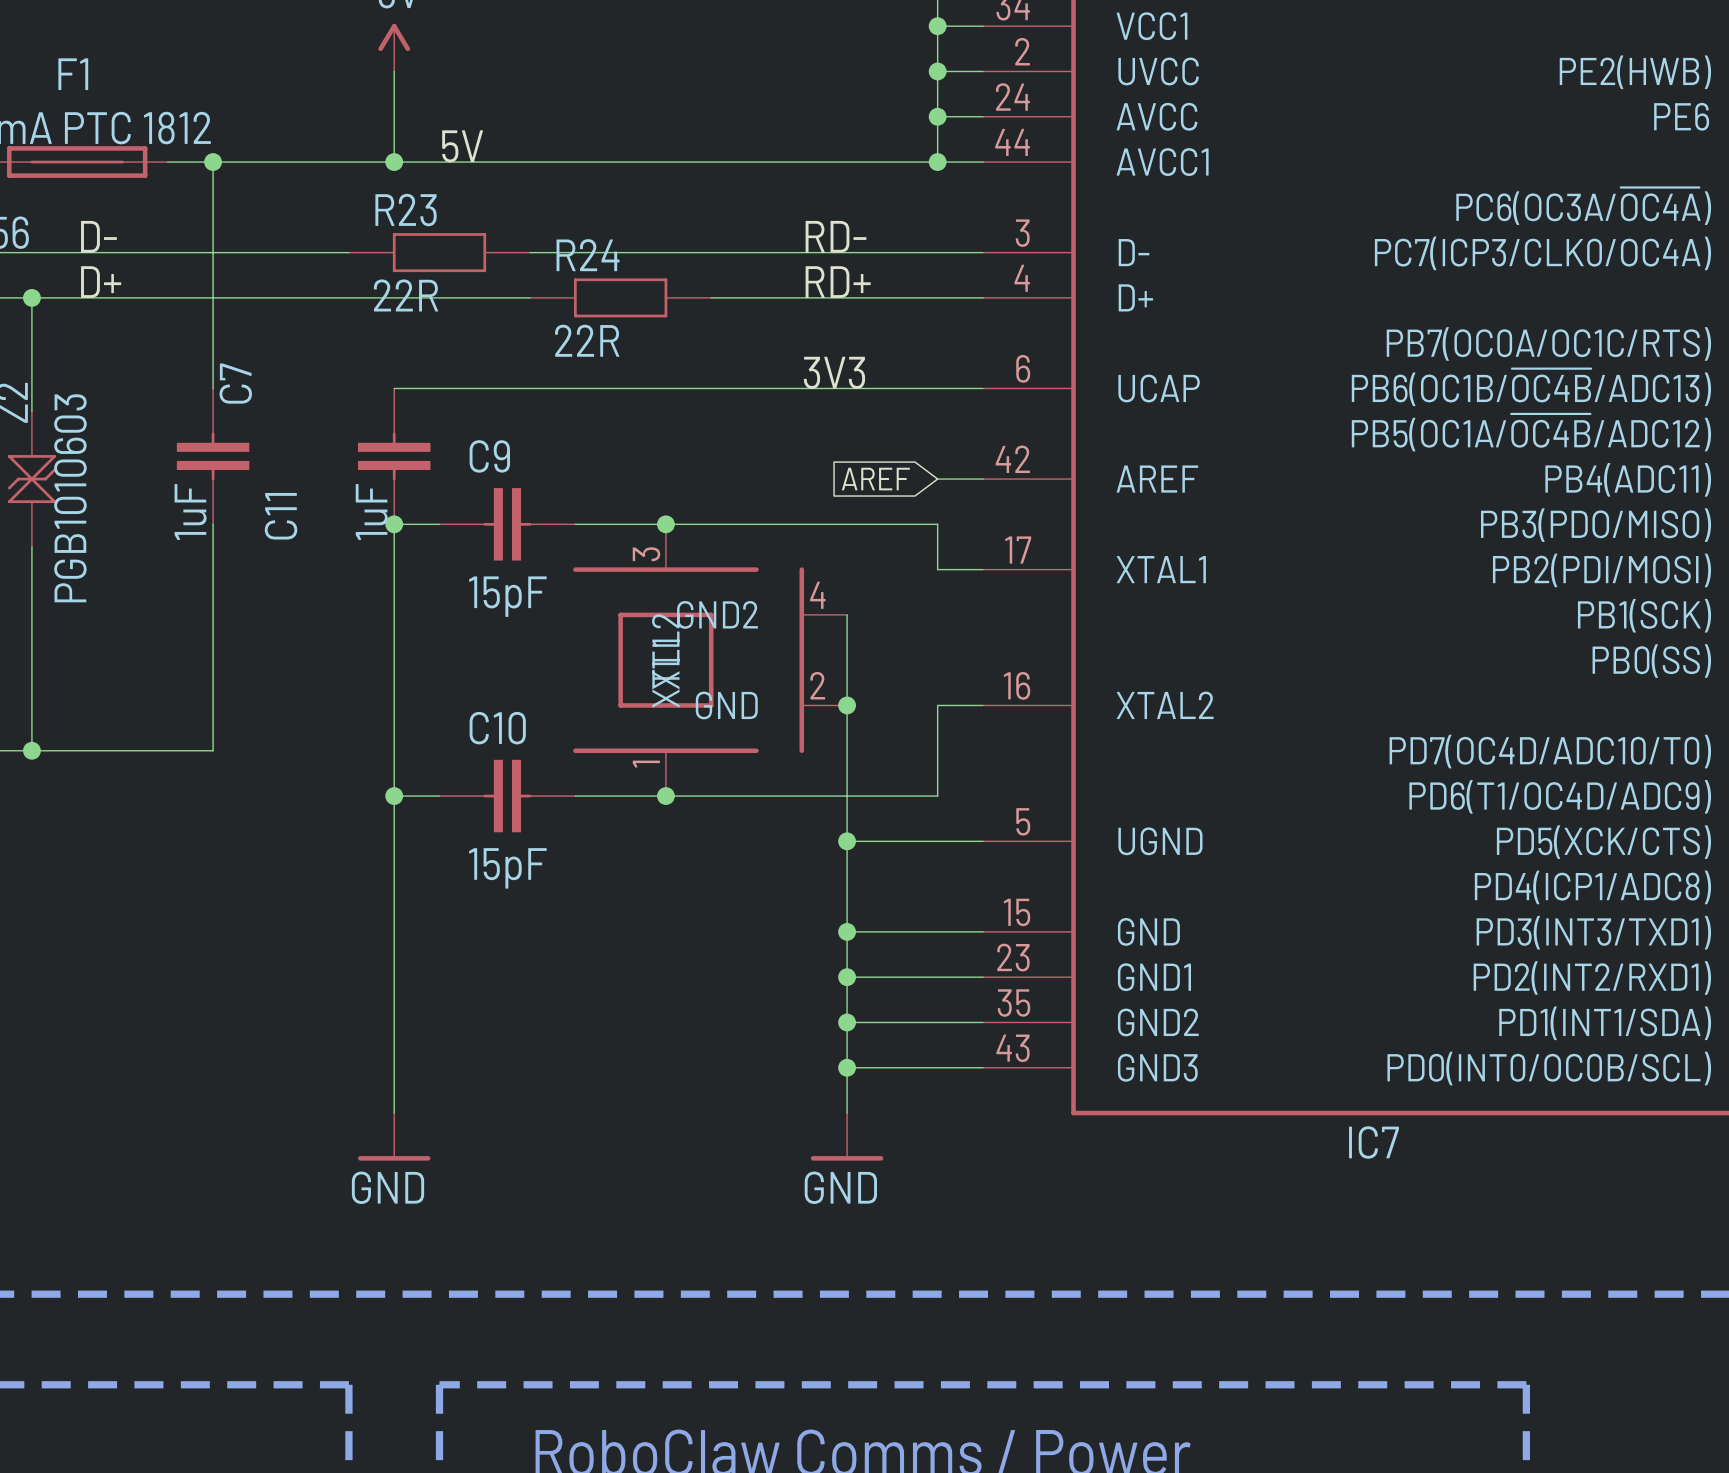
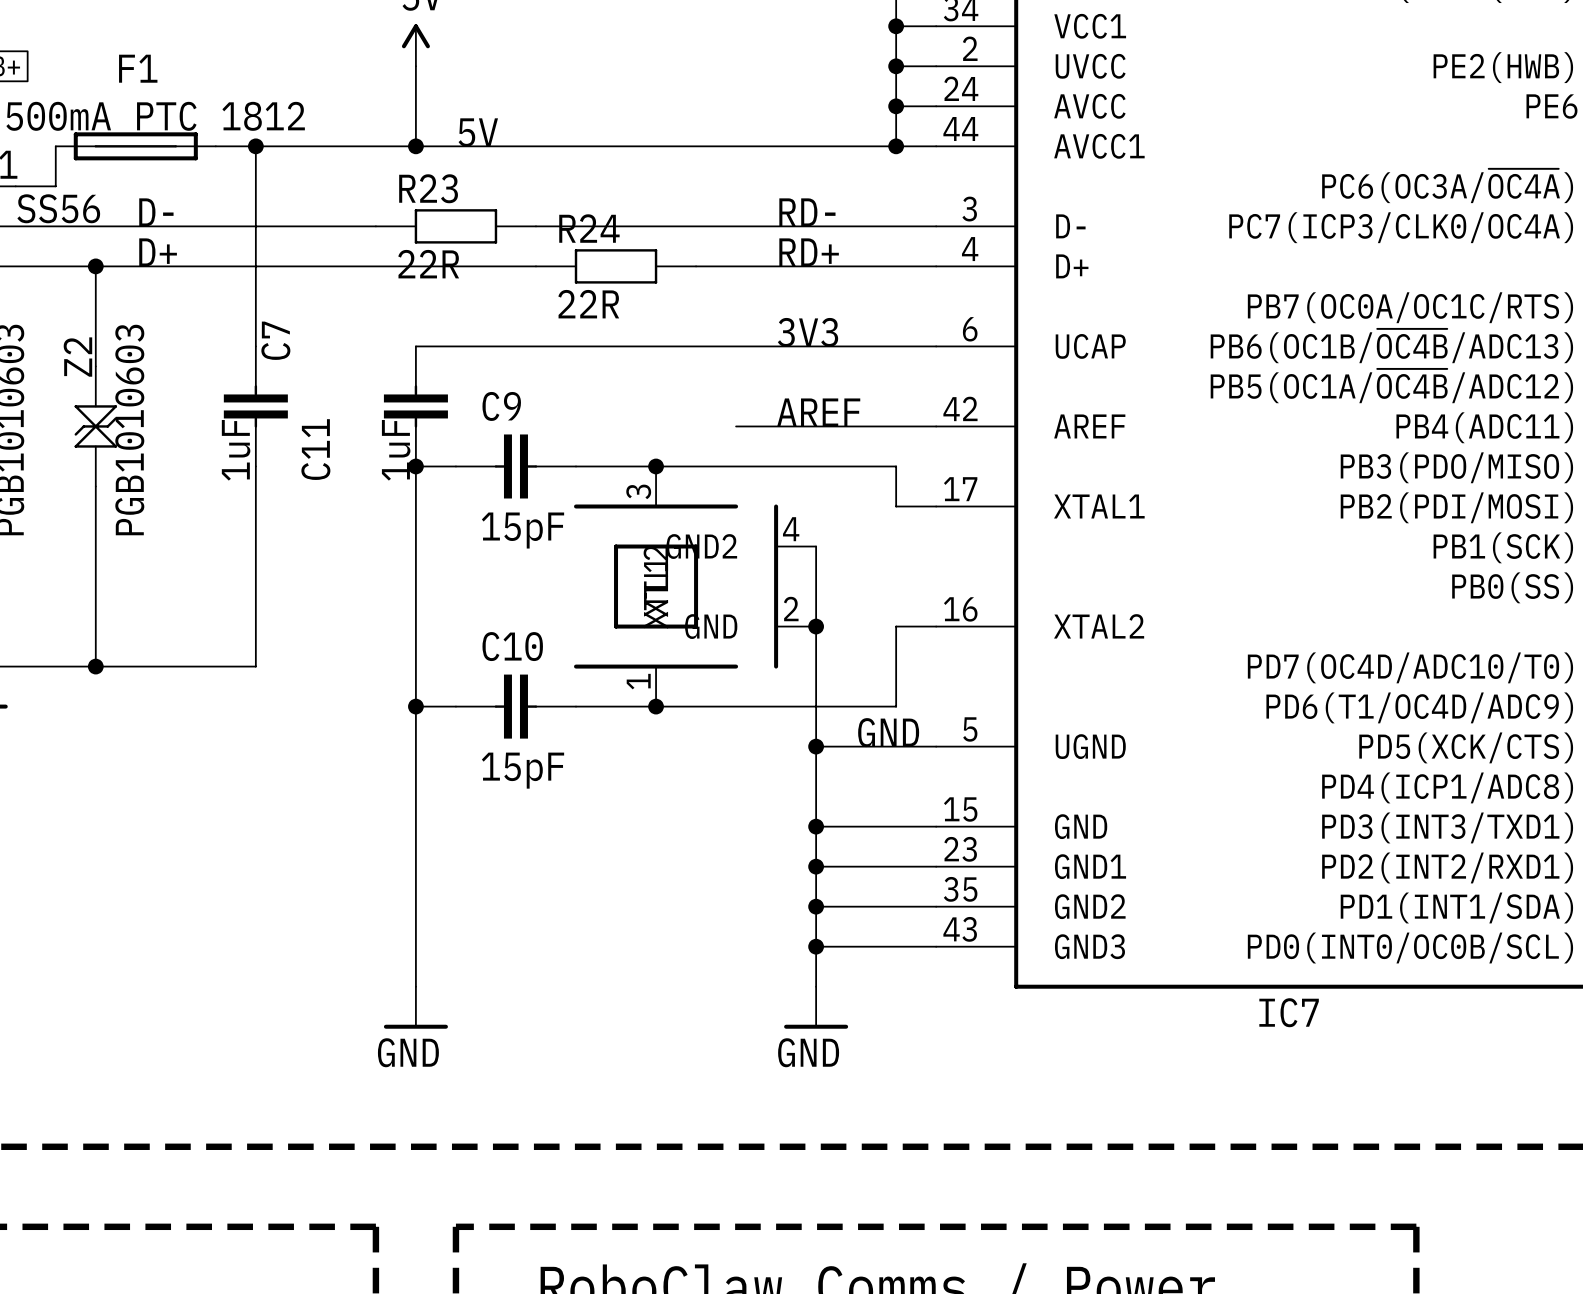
label: none -> AREF (818, 412)
wire: none -> (736, 426) (896, 426)
global label: AREF (875, 479) -> none
label: none -> GND (888, 732)

